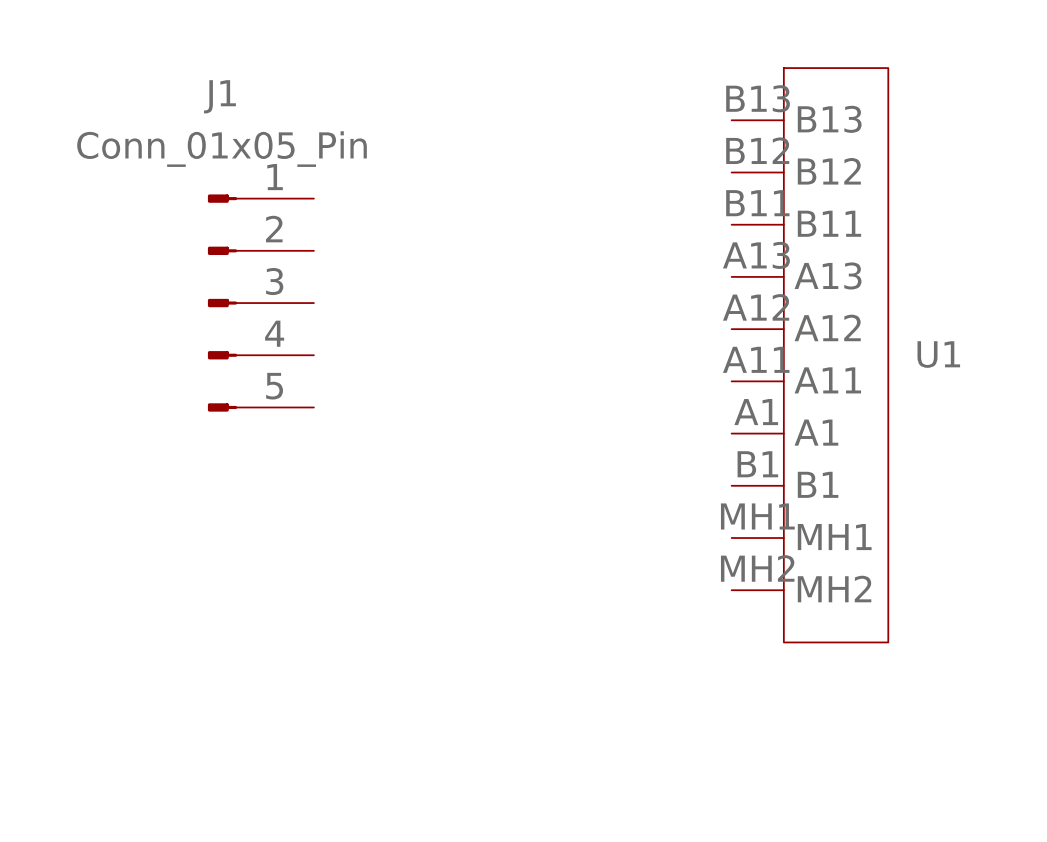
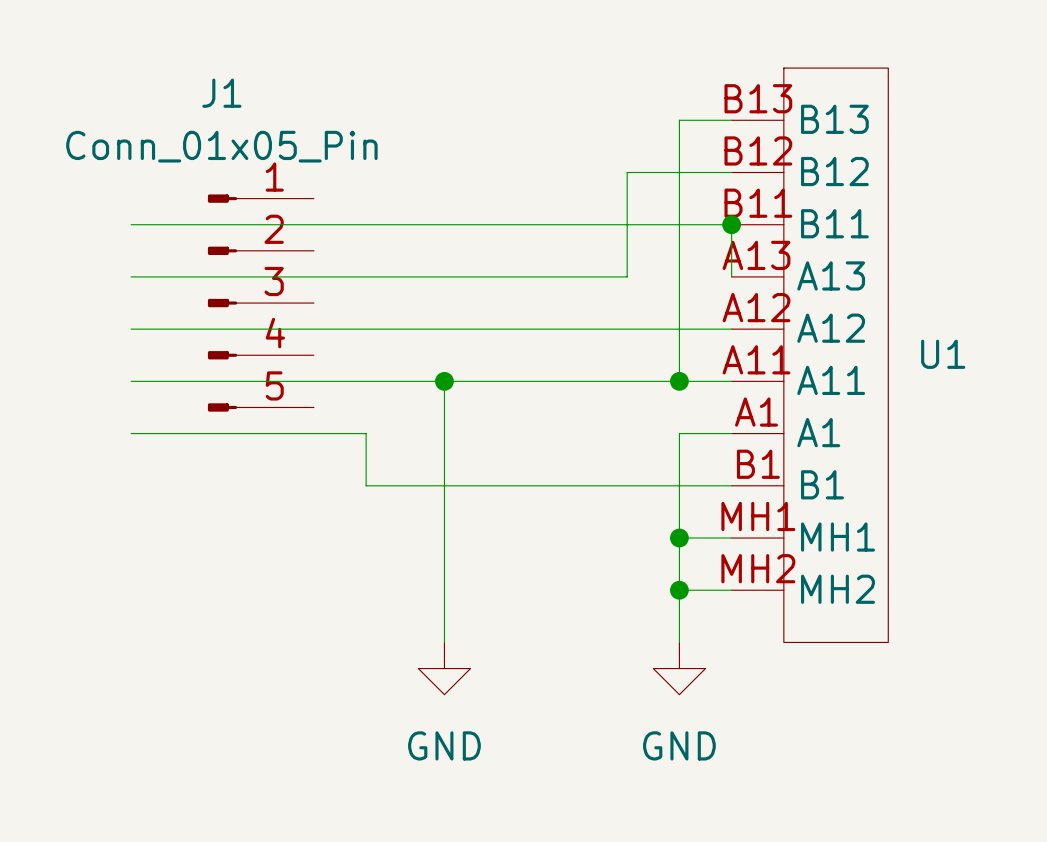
wire: none -> (731, 120) (679, 120) (679, 381)
wire: none -> (731, 172) (627, 172) (627, 276) (131, 276)
wire: none -> (131, 224) (731, 224) (731, 276)
junction: none -> (731, 224)
wire: none -> (131, 329) (731, 329)
wire: none -> (131, 381) (731, 381)
wire: none -> (444, 381) (444, 642)
junction: none -> (444, 381)
junction: none -> (679, 381)
wire: none -> (131, 433) (366, 433) (366, 485) (731, 485)
wire: none -> (731, 433) (679, 433) (679, 642)
wire: none -> (679, 538) (731, 538)
junction: none -> (679, 538)
wire: none -> (679, 590) (731, 590)
junction: none -> (679, 590)
power symbol: none -> GND (444, 668)
power symbol: none -> GND (679, 668)

